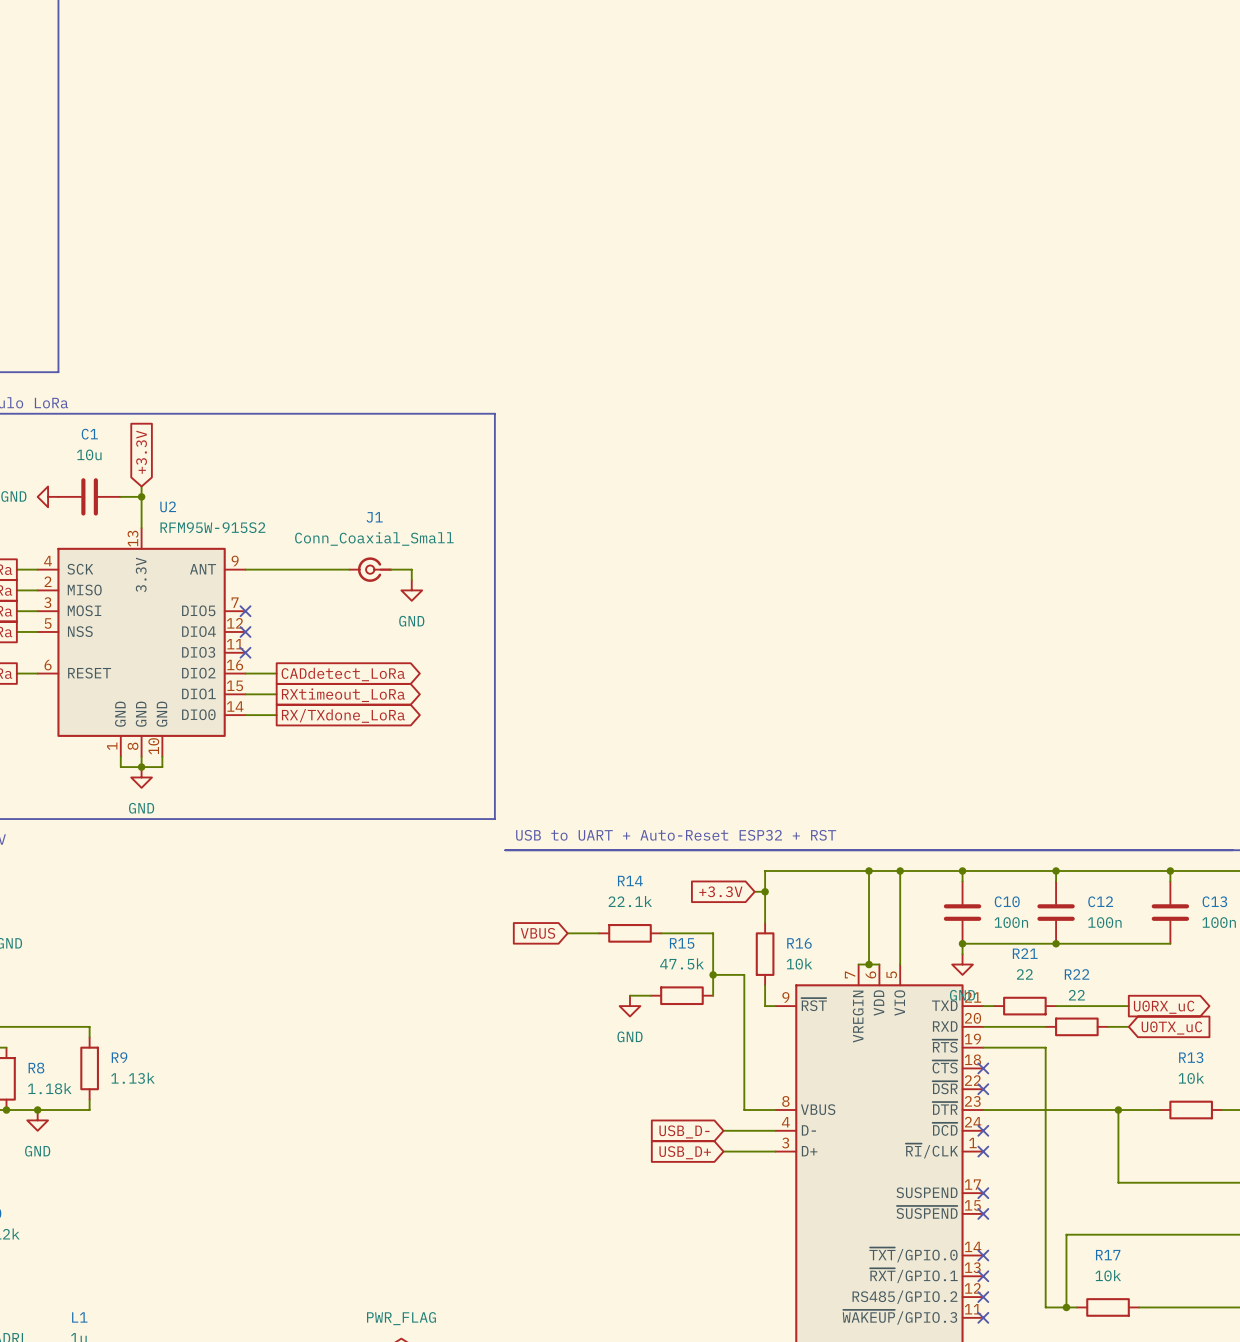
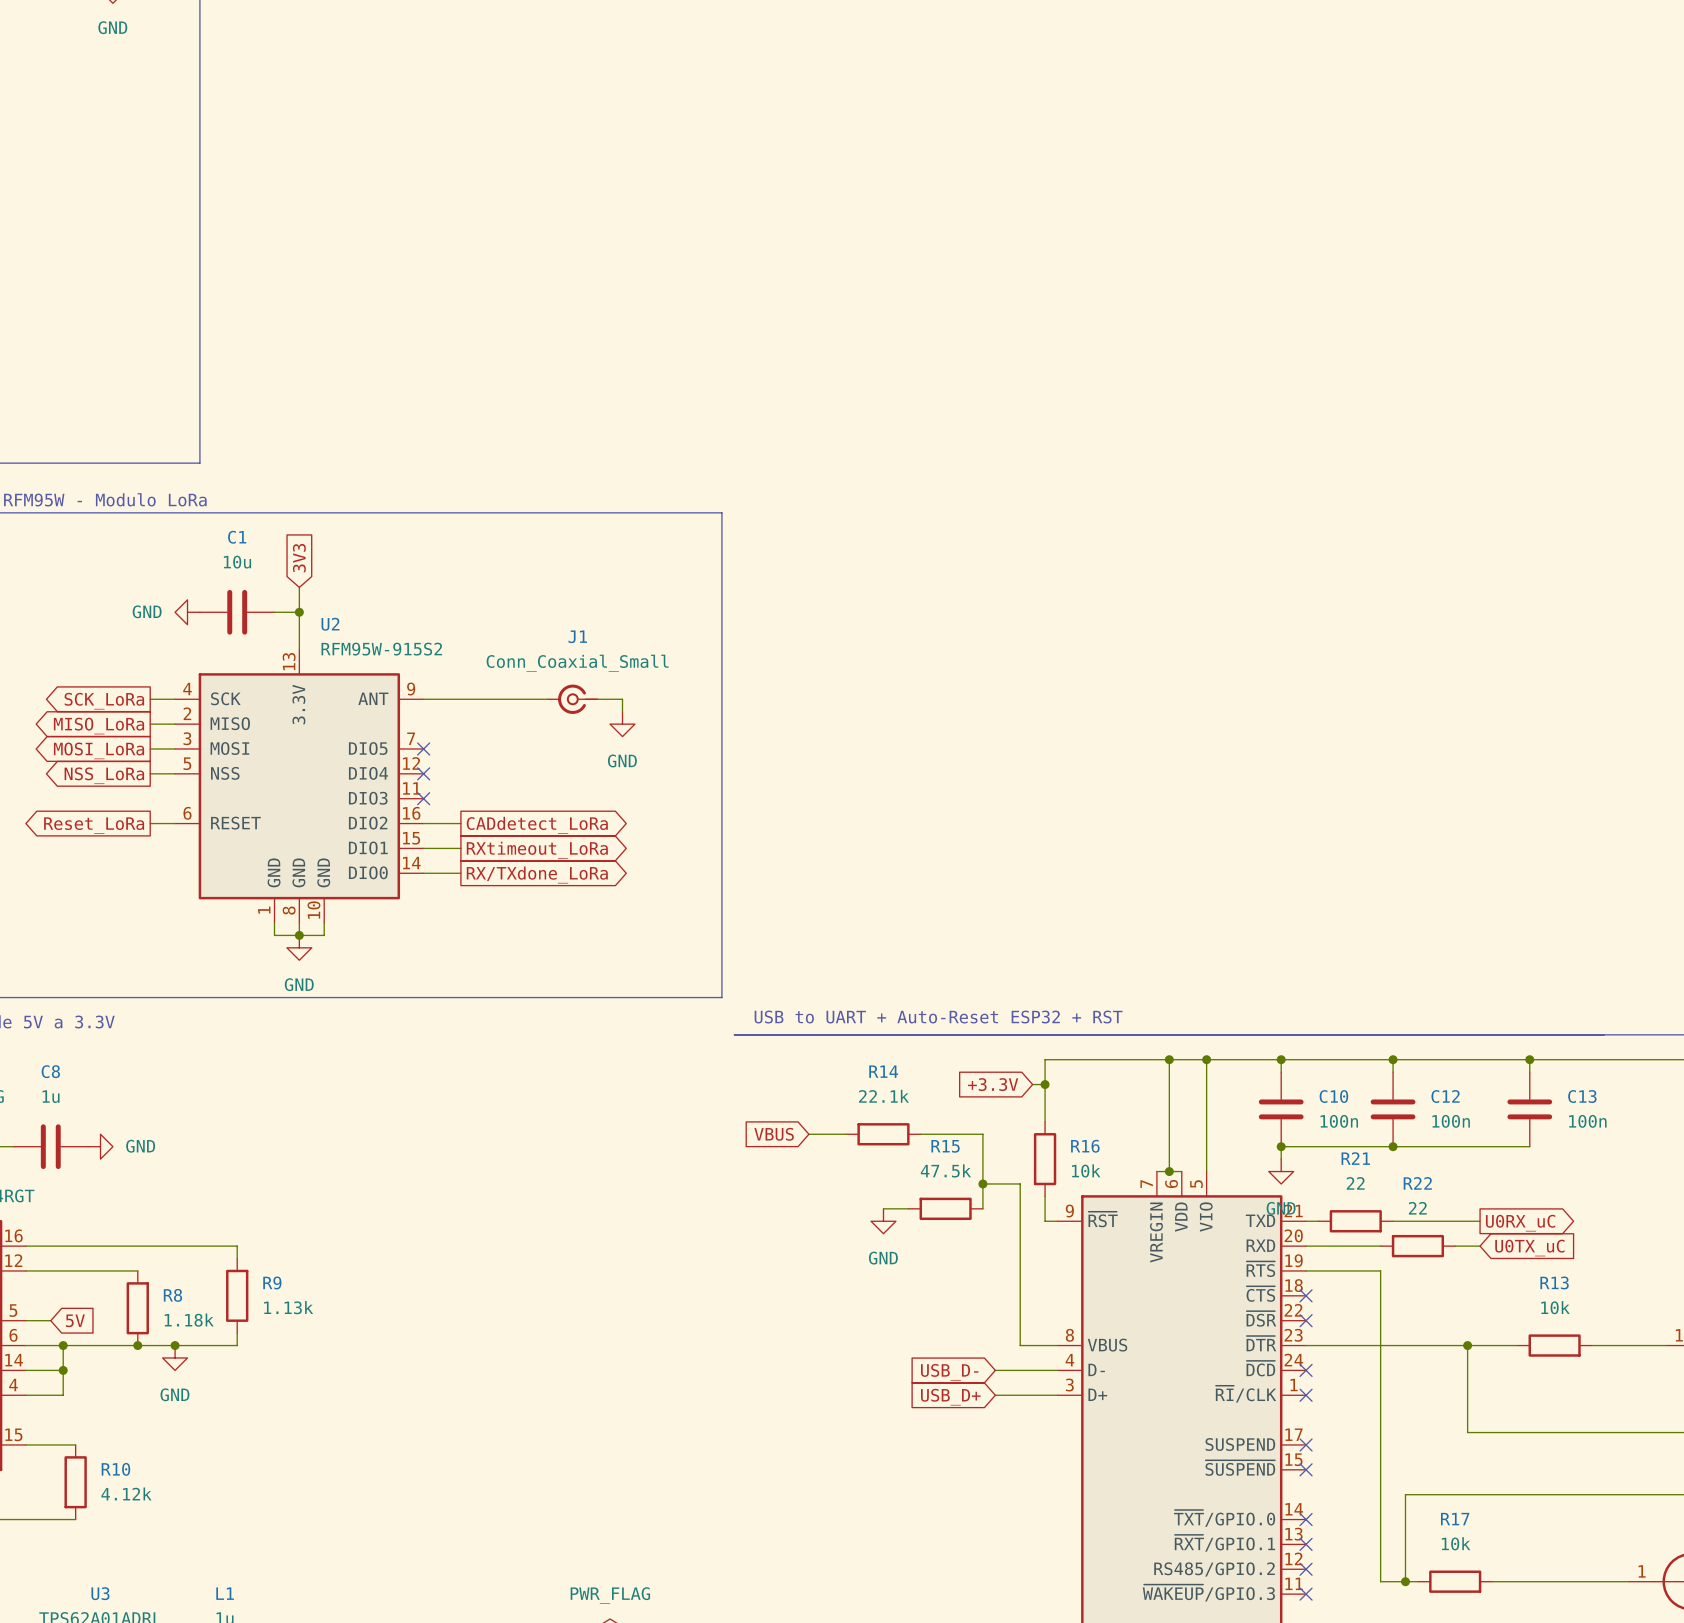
global label: none -> 3V3 (299, 558)
global label: +3.3V (141, 452) -> none
wire: none -> (299, 587) (299, 599)

